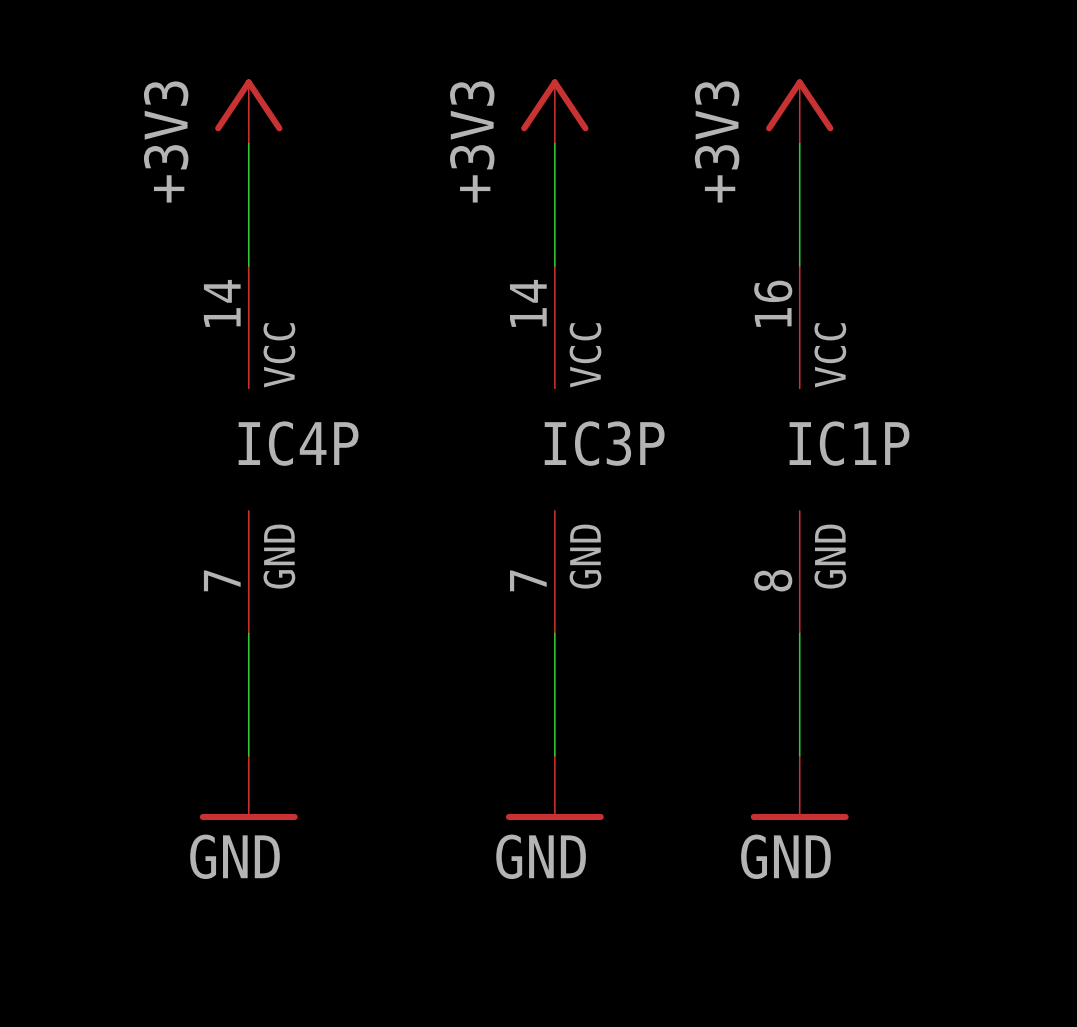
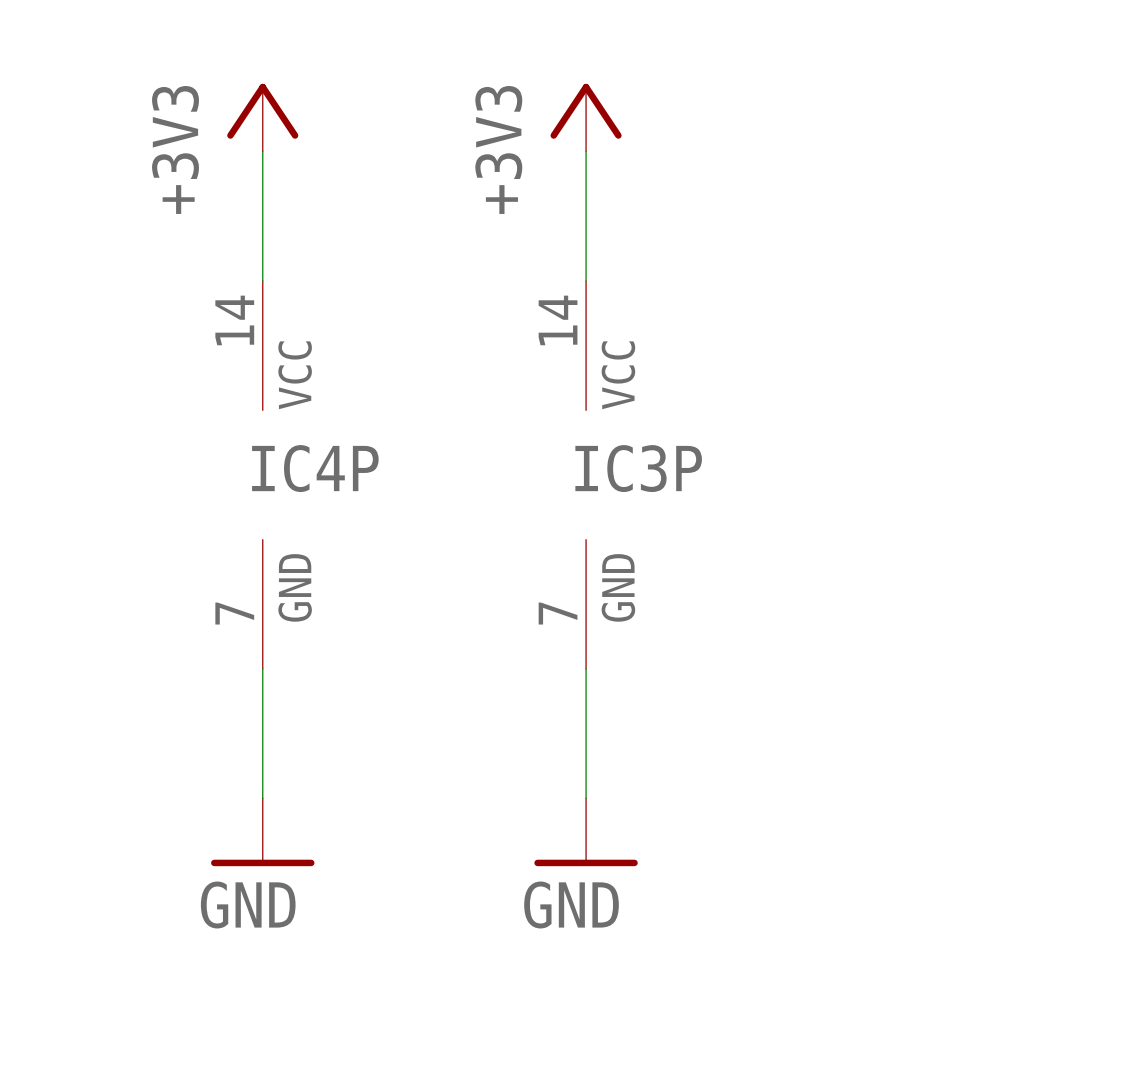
power symbol: +3V3 (799, 111) -> none
wire: (799, 143) (799, 266) -> none
IC1P: (799, 449) -> none
wire: (799, 633) (799, 755) -> none
power symbol: GND (799, 787) -> none

